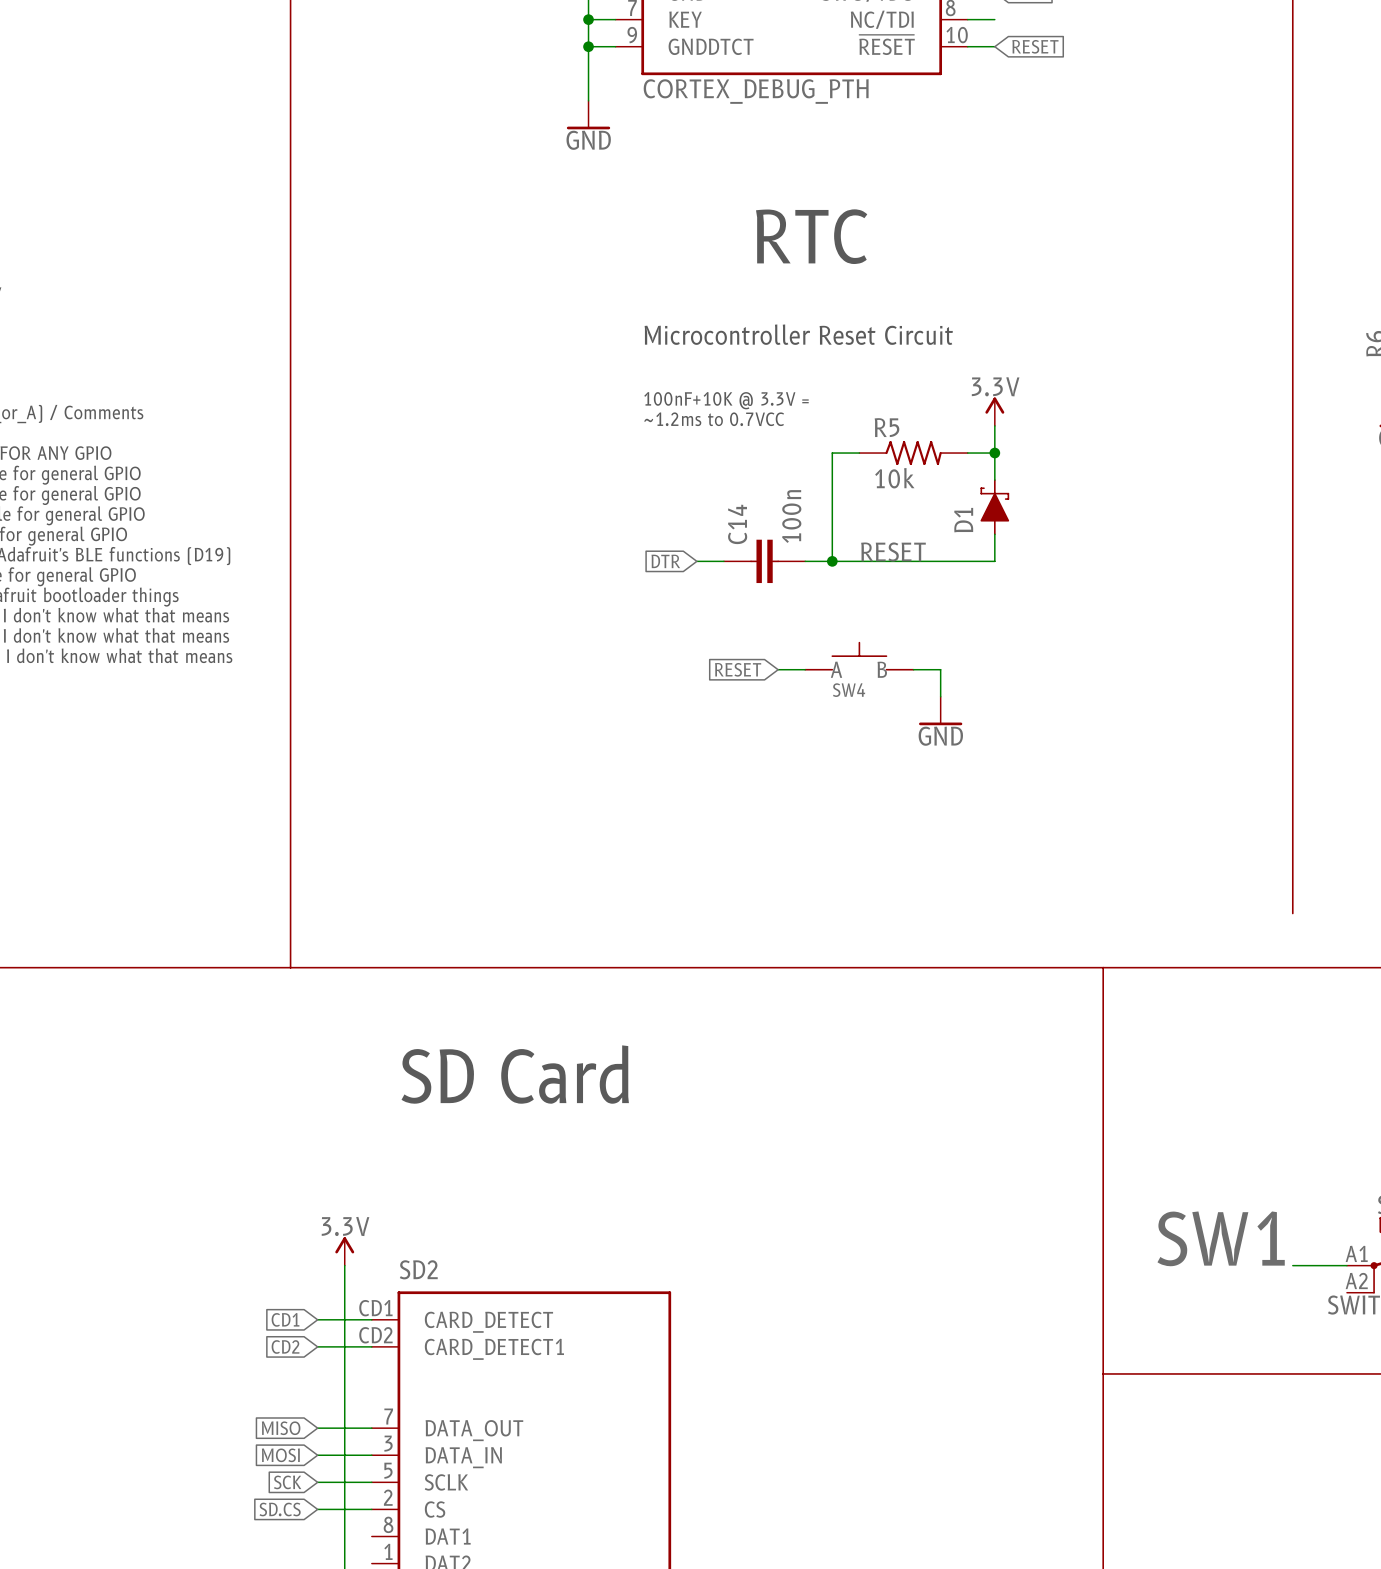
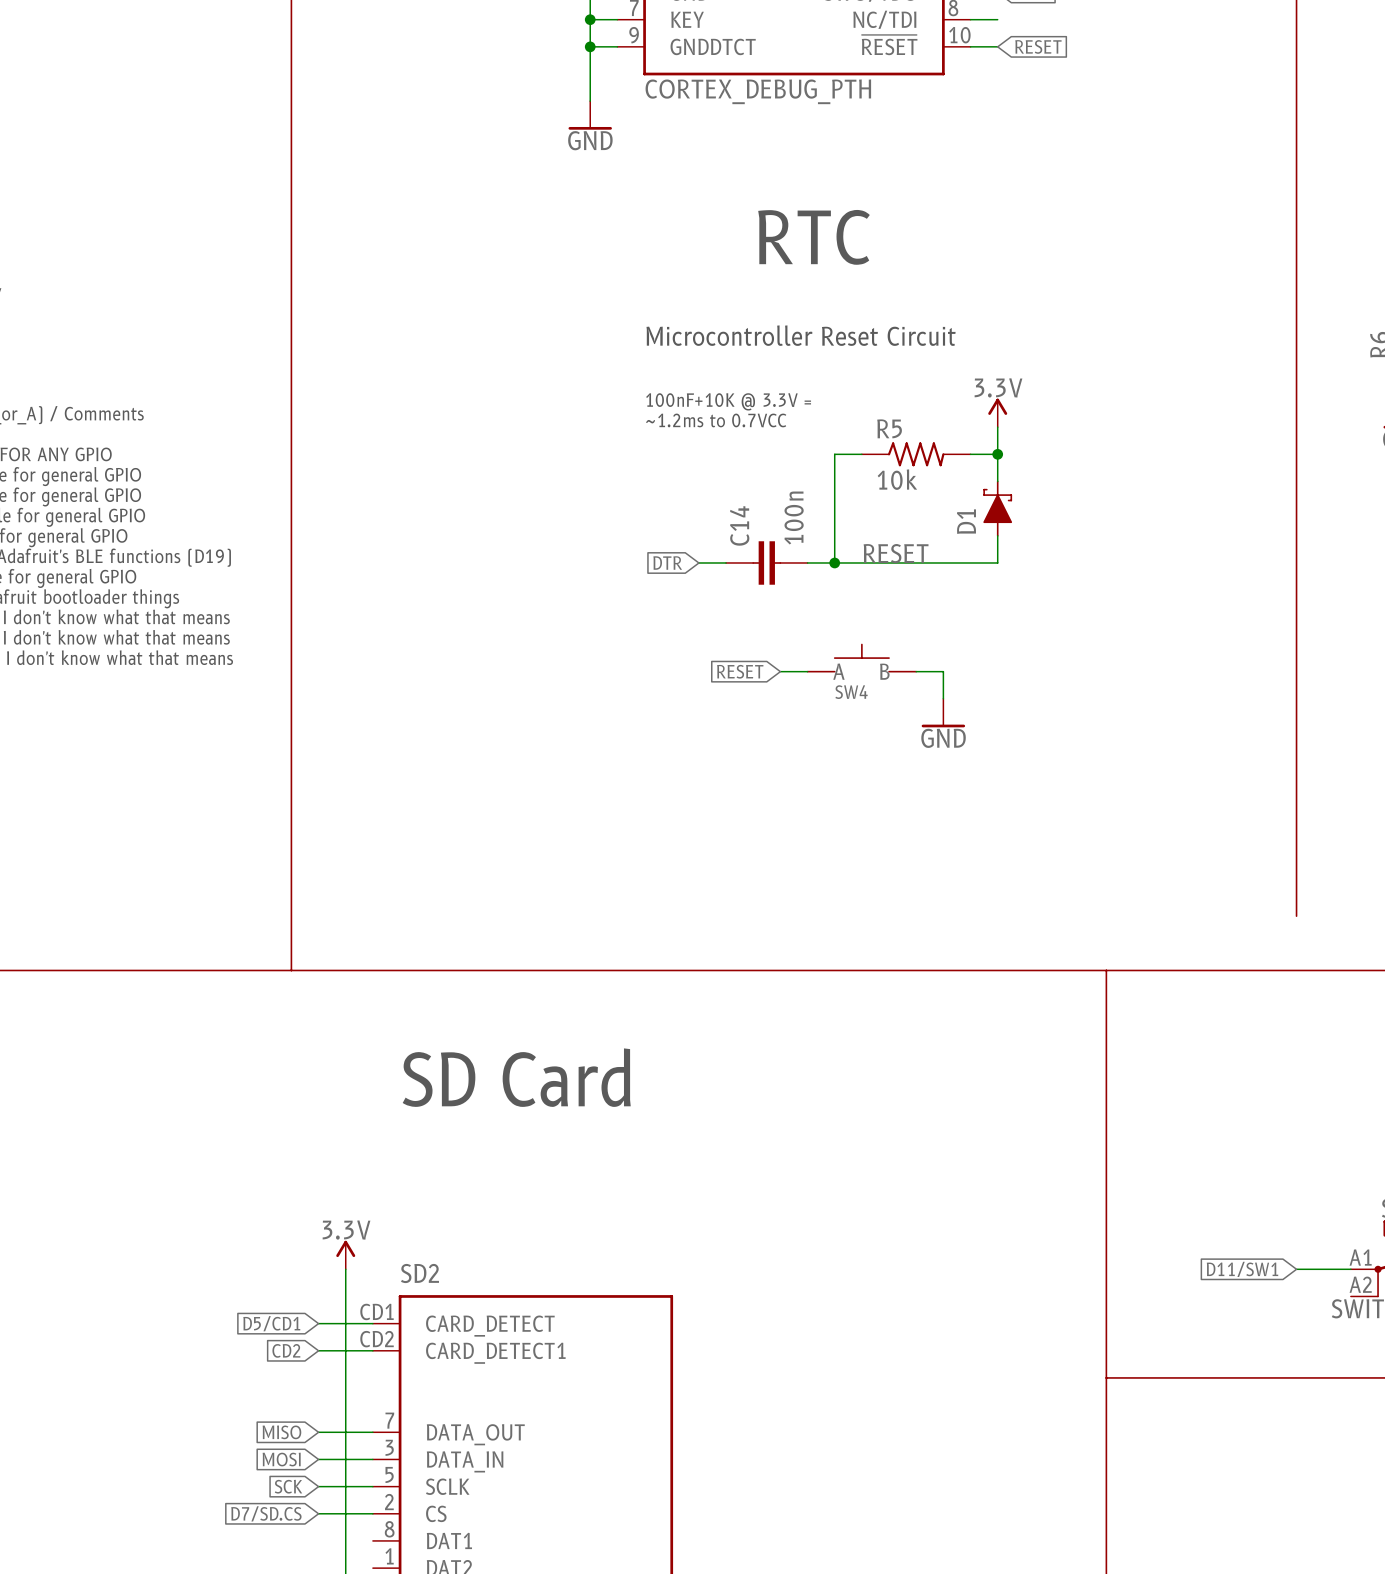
label: SW1 (1221, 1238) -> none
global label: none -> D11/SW1 (1242, 1269)
global label: CD1 (285, 1319) -> D5/CD1 (271, 1323)
global label: SD.CS (280, 1509) -> D7/SD.CS (266, 1513)

